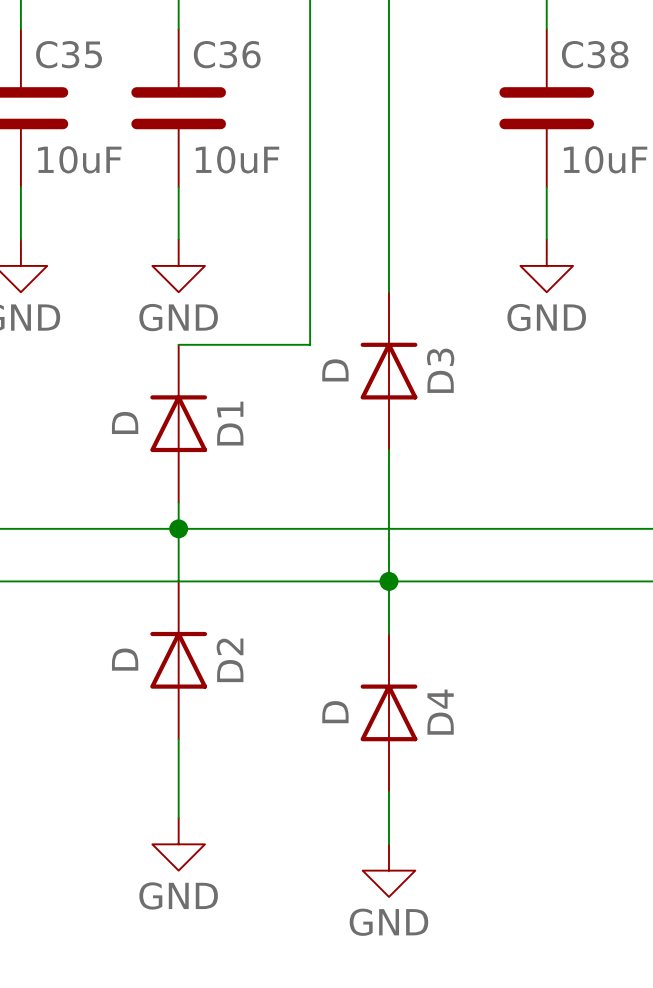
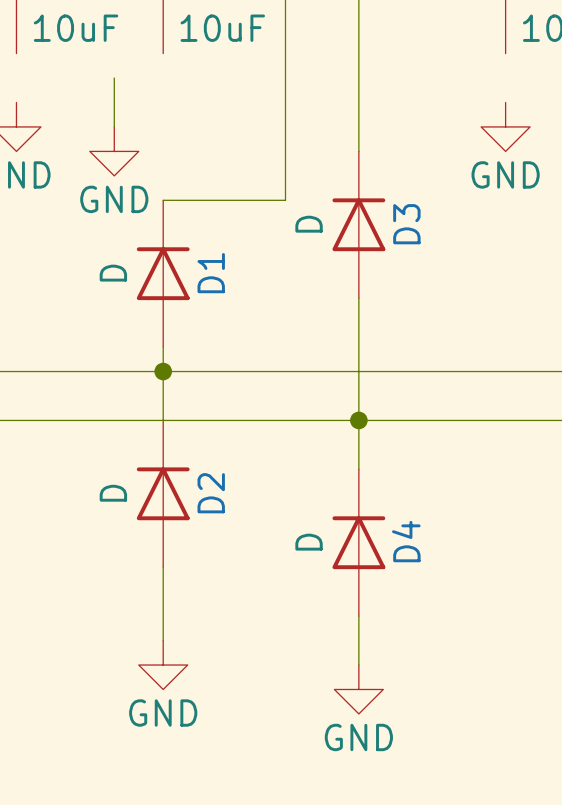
wire: (20, 187) (20, 239) -> none
wire: (178, 187) (178, 239) -> (114, 78) (114, 126)
wire: (546, 187) (546, 239) -> none
power symbol position: GND (178, 265) -> GND (114, 151)

